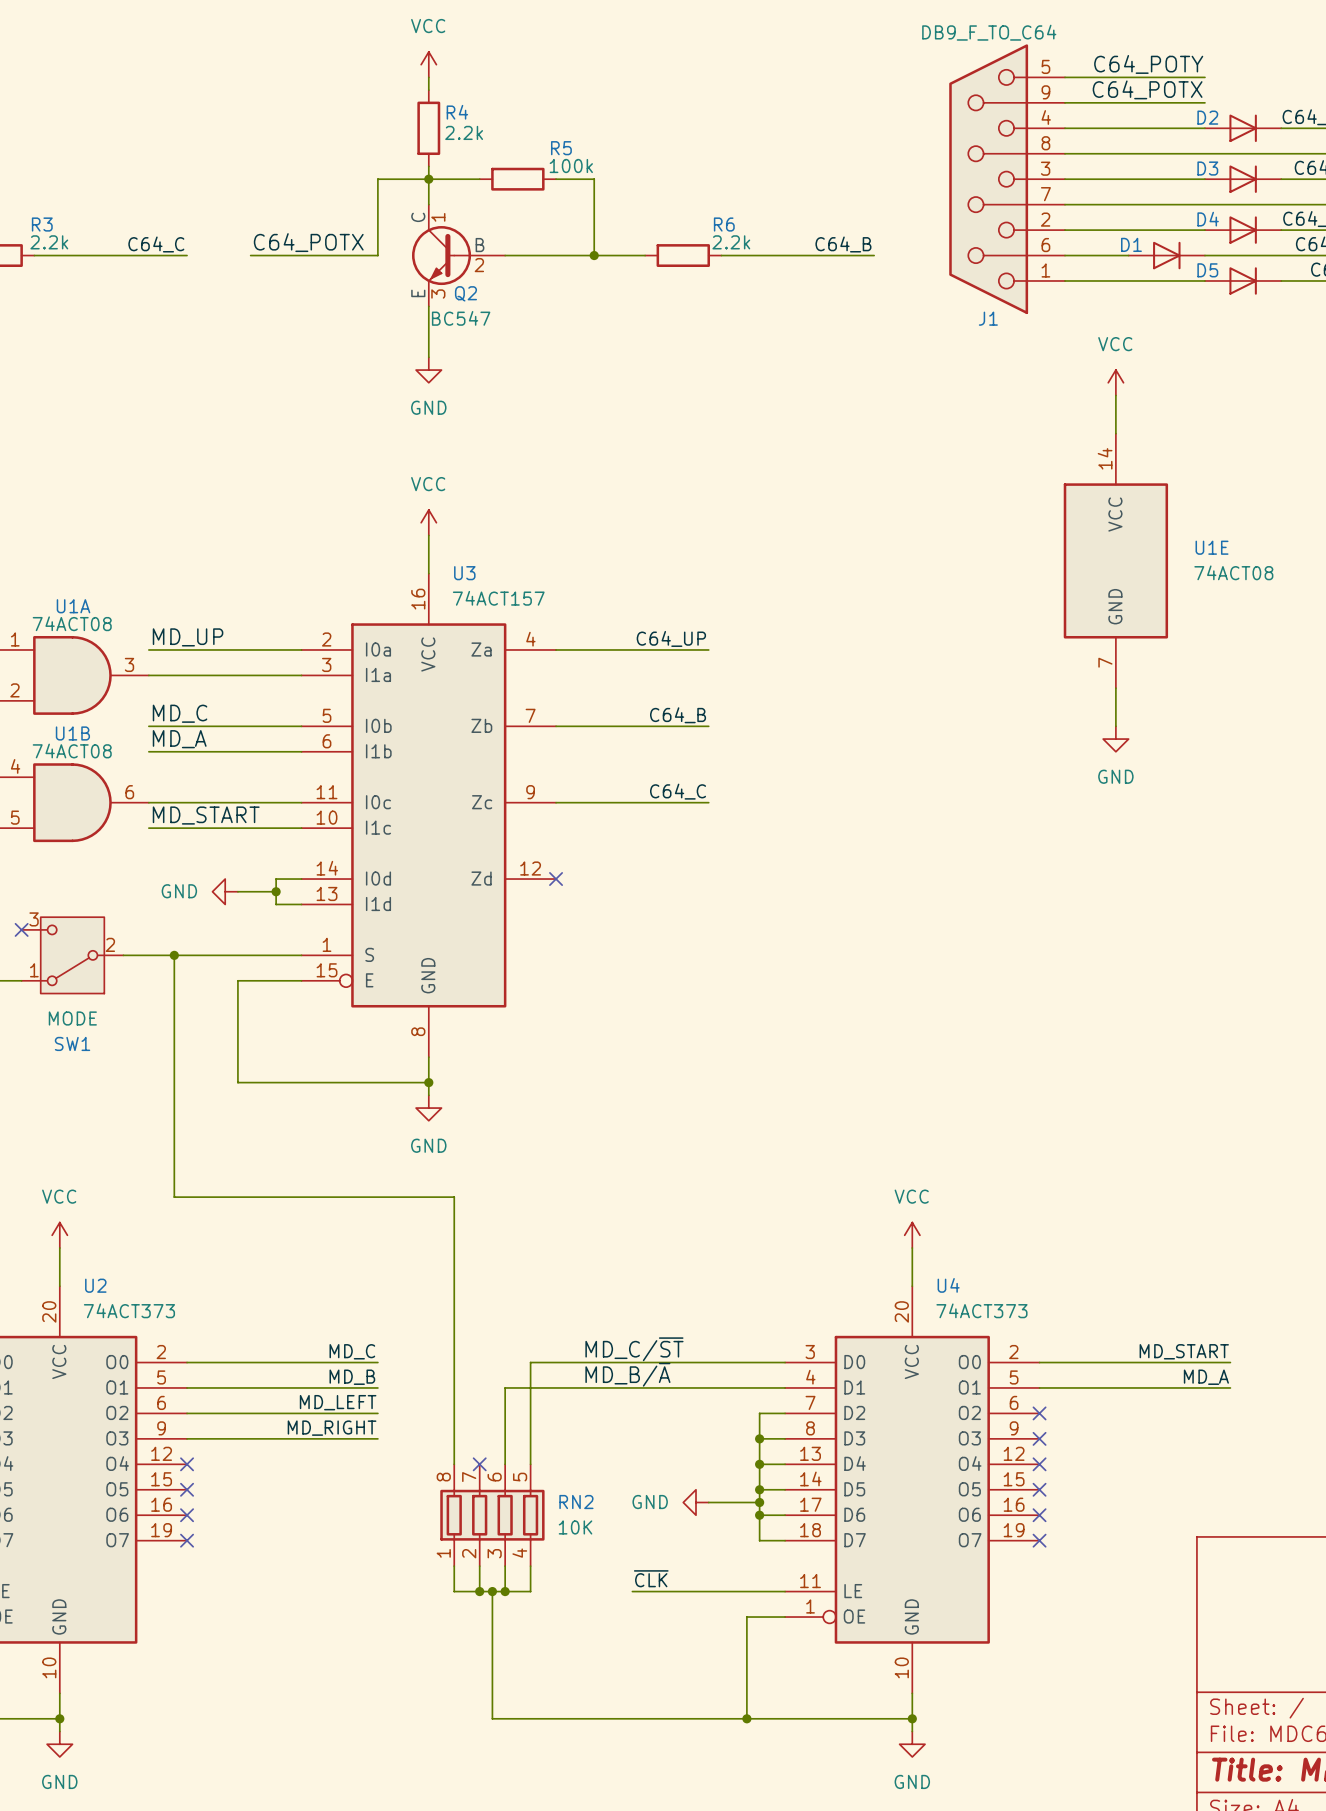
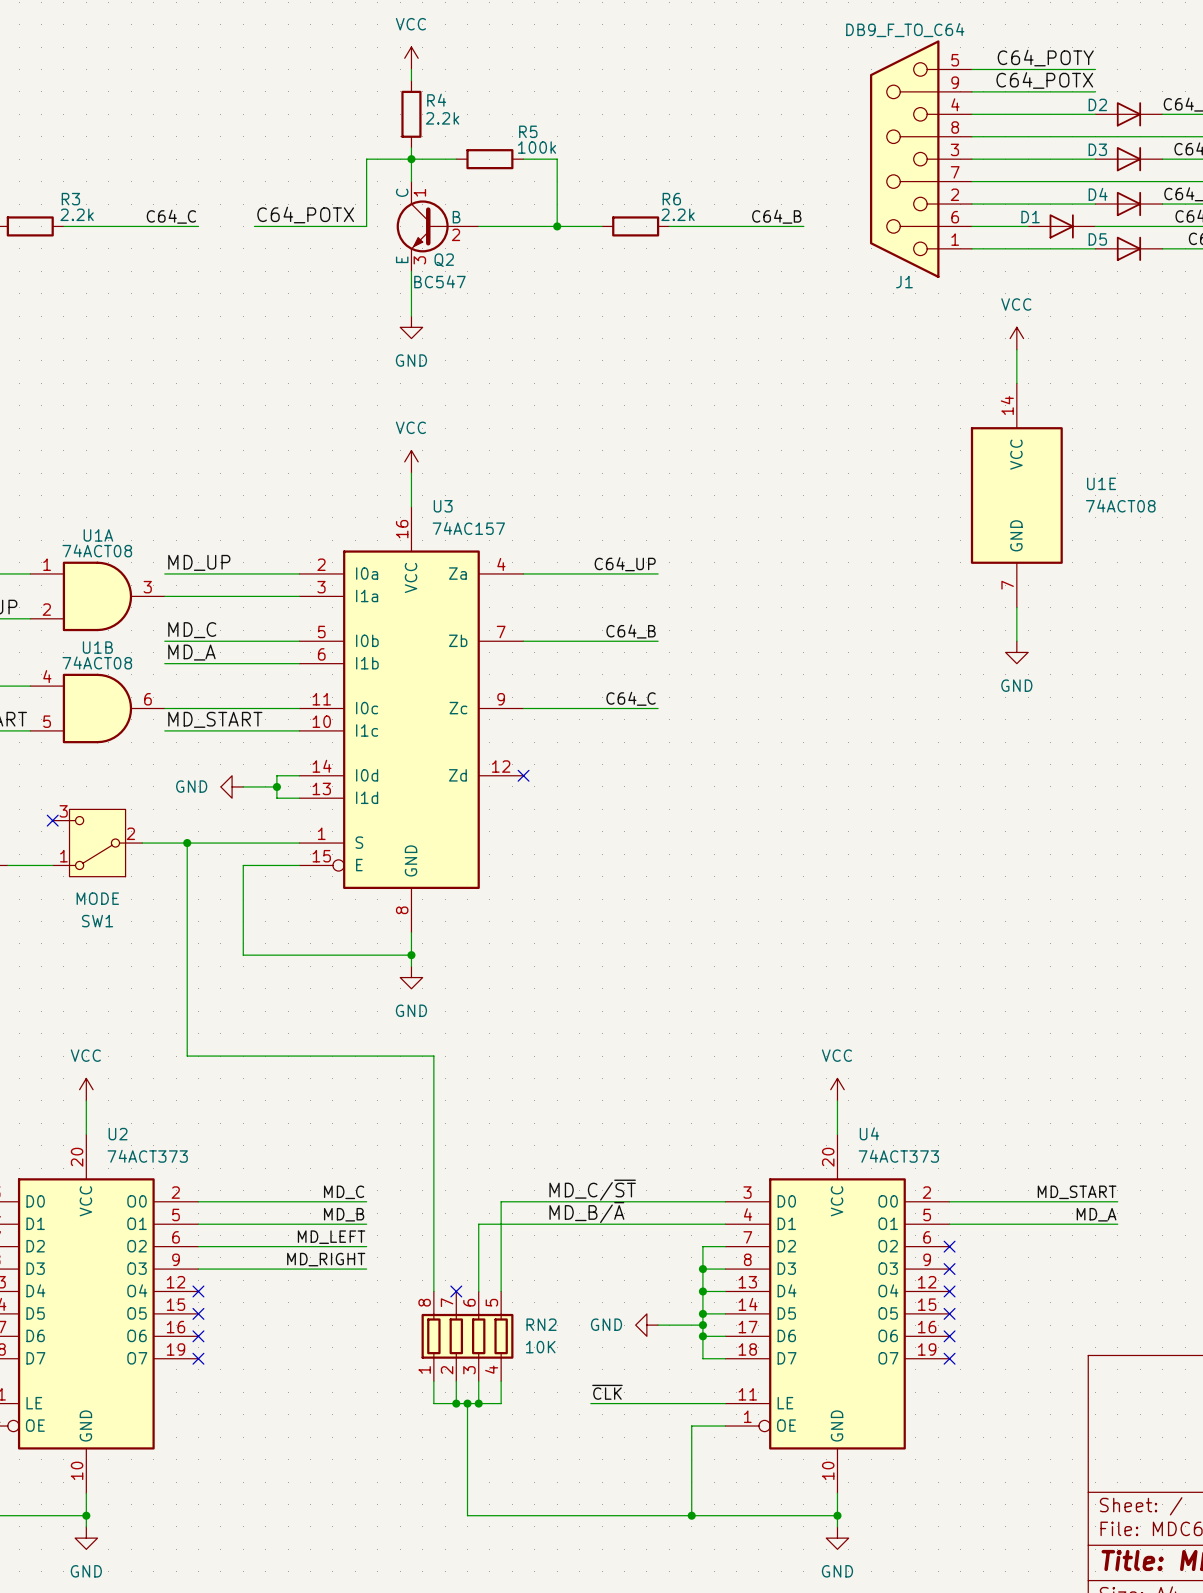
U3 value: 74ACT157 (498, 598) -> 74AC157 (468, 528)

